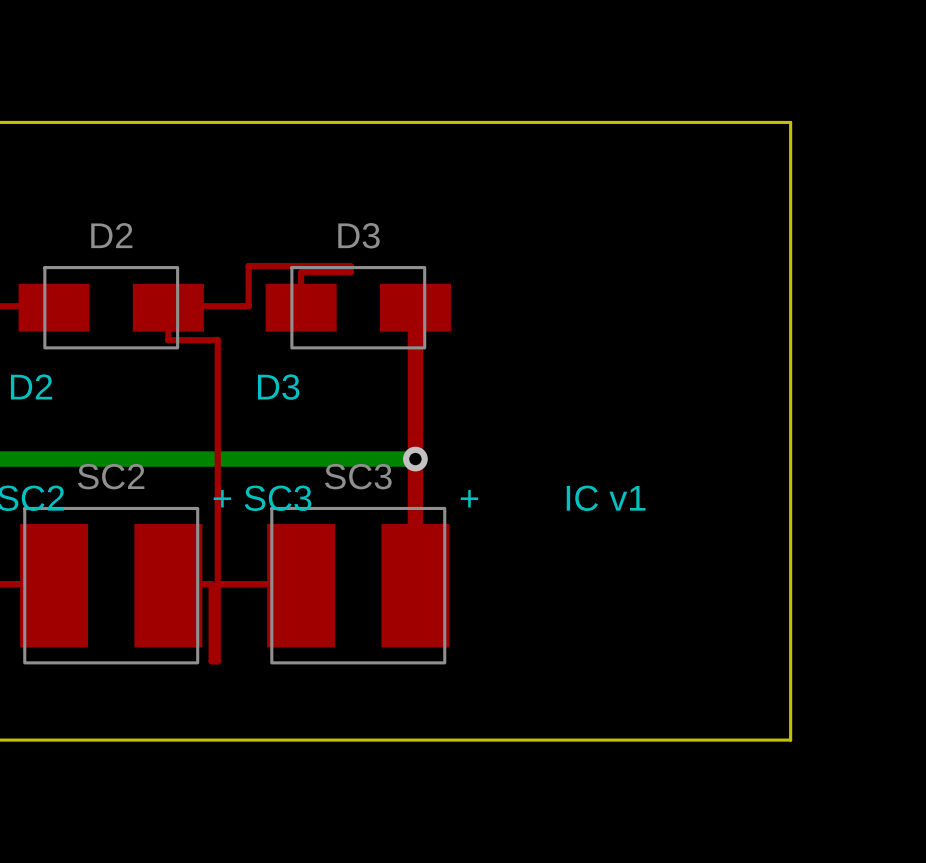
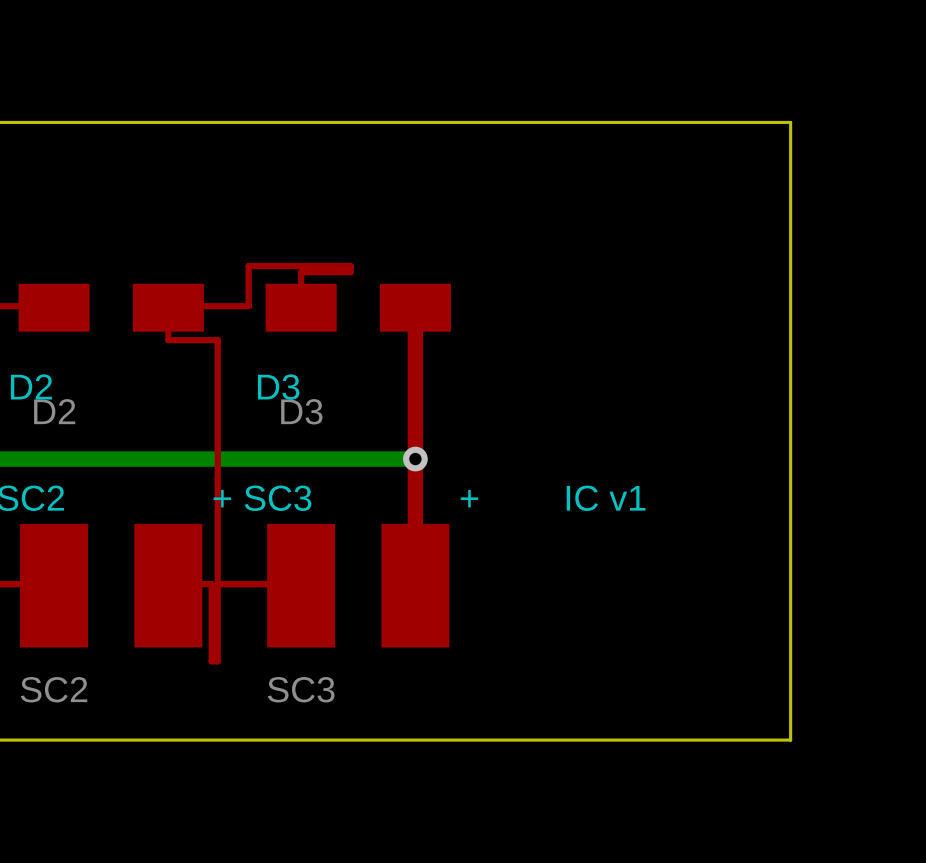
D2 name position: D2 (111, 235) -> D2 (54, 411)
D3 name position: D3 (358, 235) -> D3 (301, 411)
D2 footprint: [18, 266, 204, 350] -> [18, 283, 204, 332]
D3 footprint: [265, 266, 451, 350] -> [265, 283, 451, 332]
SC2 name position: SC2 (111, 476) -> SC2 (54, 689)
SC3 name position: SC3 (358, 476) -> SC3 (301, 689)
SC2 footprint: [20, 506, 203, 665] -> [20, 523, 203, 648]
SC3 footprint: [267, 506, 450, 665] -> [267, 523, 450, 648]

